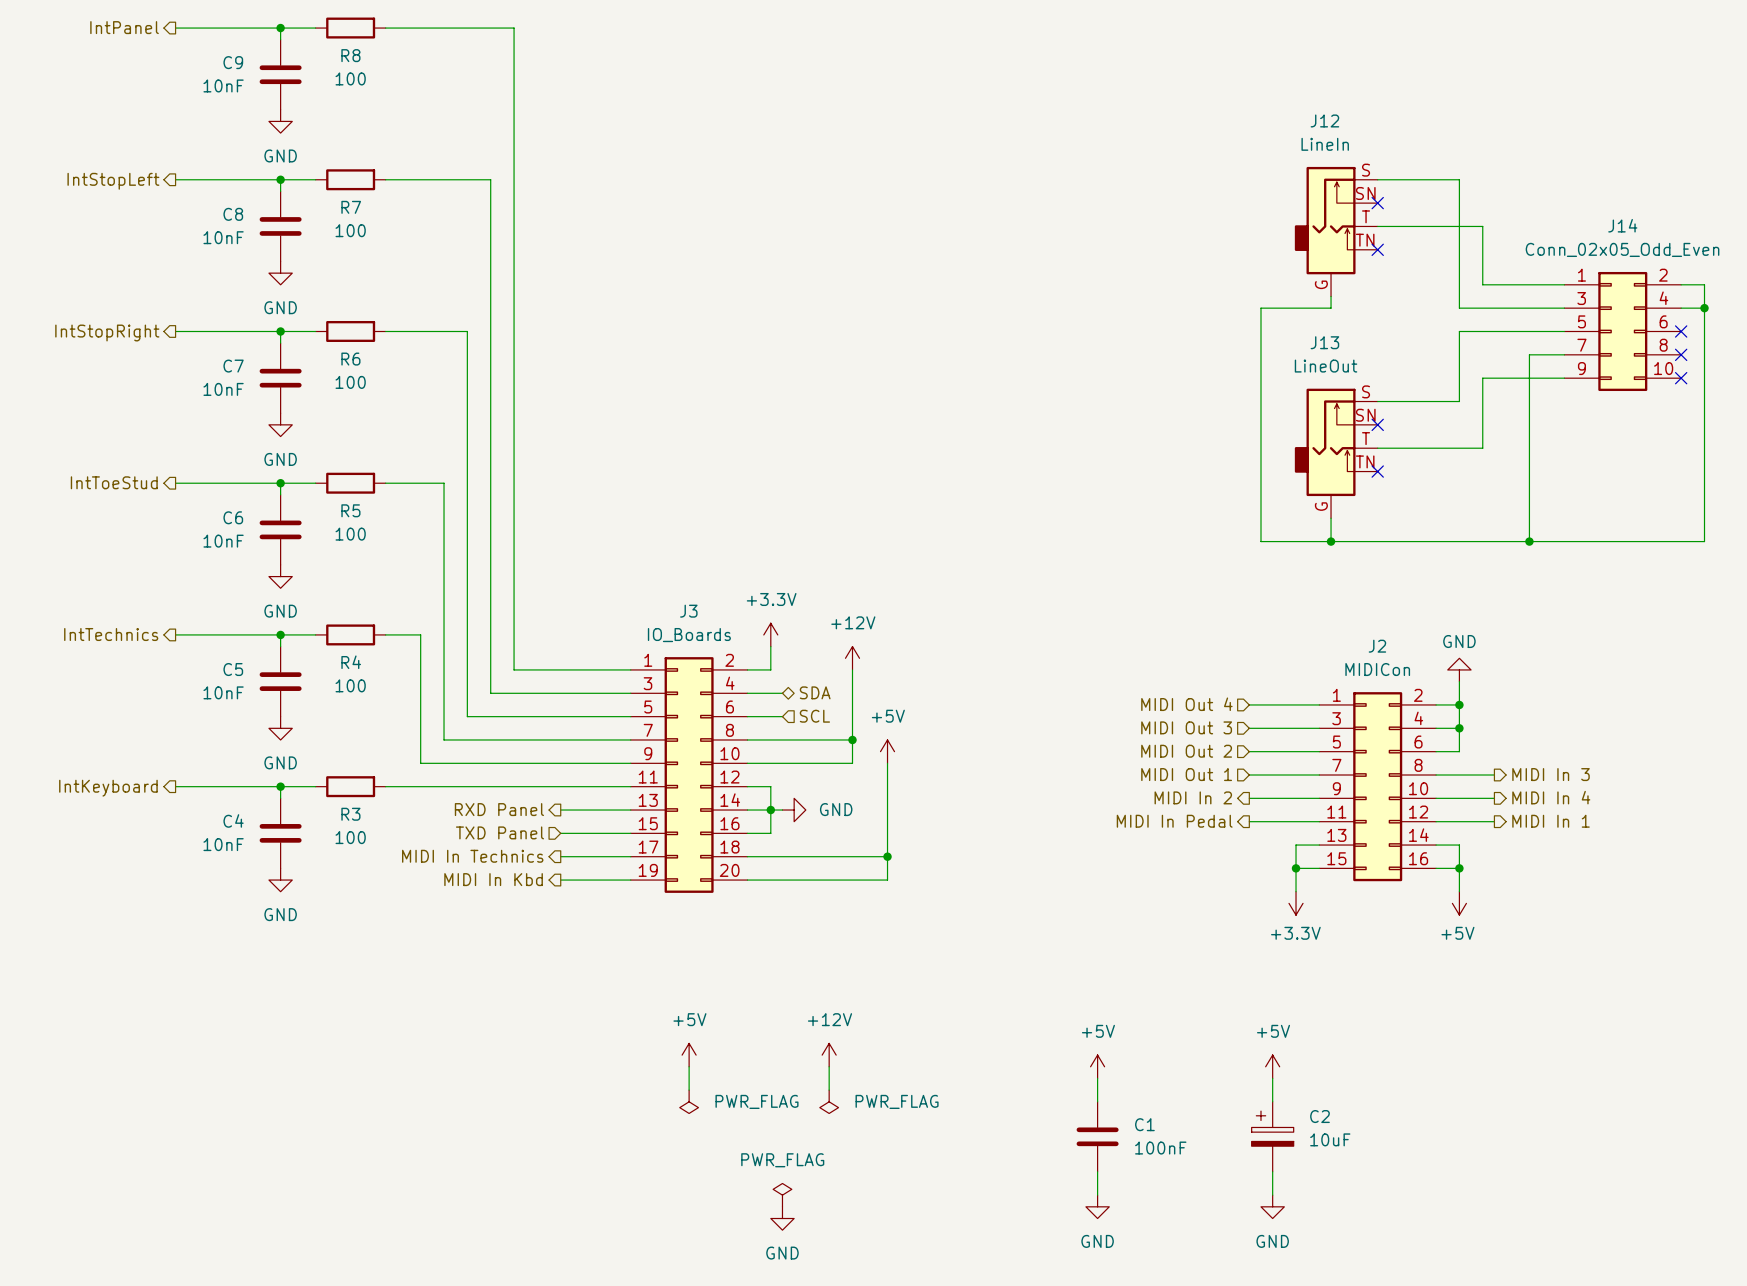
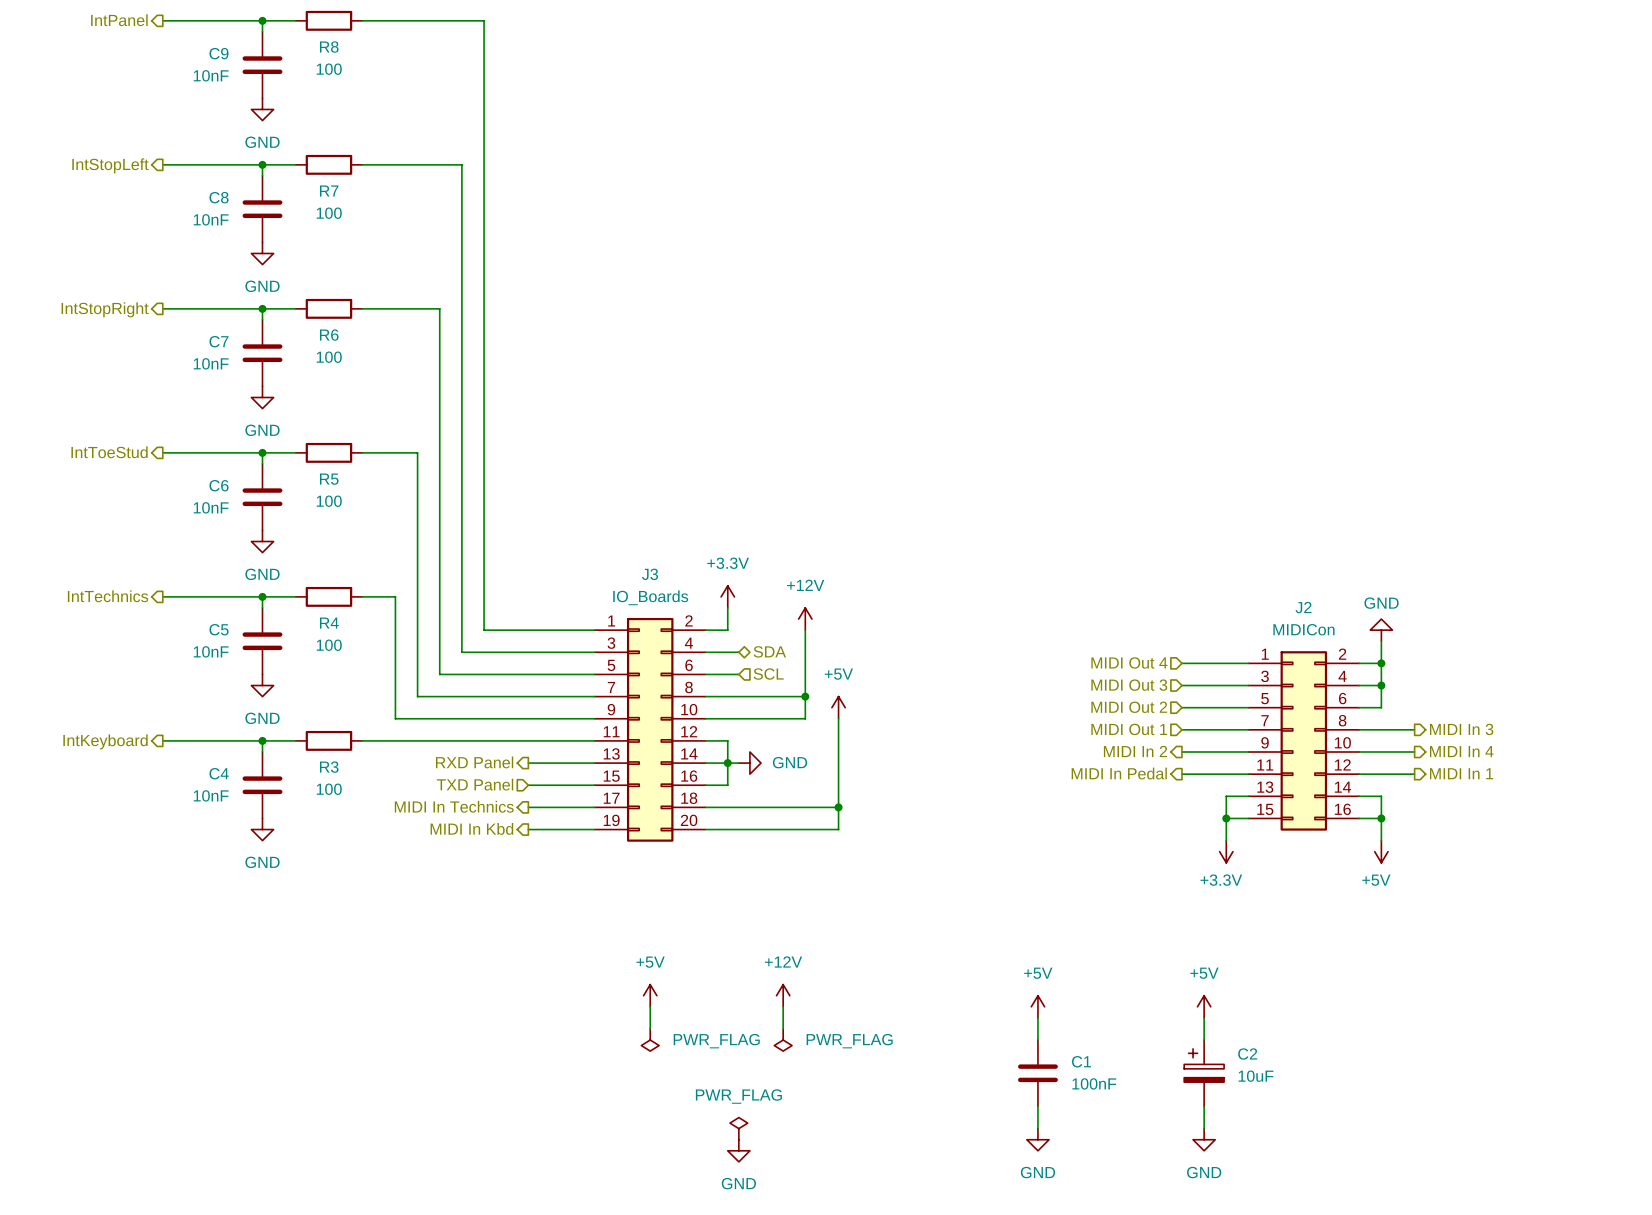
wire: (1377, 179) (1459, 179) (1459, 308) (1564, 308) -> none
no-connect mark: (1377, 203) -> none
wire: (1377, 226) (1482, 226) (1482, 284) (1564, 284) -> none
J12: LineIn (1336, 231) -> none
no-connect mark: (1377, 249) -> none
wire: (1681, 284) (1704, 284) (1704, 541) (1260, 541) (1260, 308) (1331, 308) (1331, 296) -> none
wire: (1681, 308) (1704, 308) -> none
junction: (1704, 308) -> none
wire: (1564, 331) (1459, 331) (1459, 401) (1377, 401) -> none
J14: Conn_02x05_Odd_Even (1622, 331) -> none
no-connect mark: (1681, 331) -> none
wire: (1564, 354) (1529, 354) (1529, 541) -> none
no-connect mark: (1681, 354) -> none
wire: (1564, 378) (1482, 378) (1482, 448) (1377, 448) -> none
no-connect mark: (1681, 378) -> none
no-connect mark: (1377, 424) -> none
J13: LineOut (1336, 453) -> none
no-connect mark: (1377, 471) -> none
wire: (1331, 518) (1331, 541) -> none
junction: (1331, 541) -> none
junction: (1529, 541) -> none

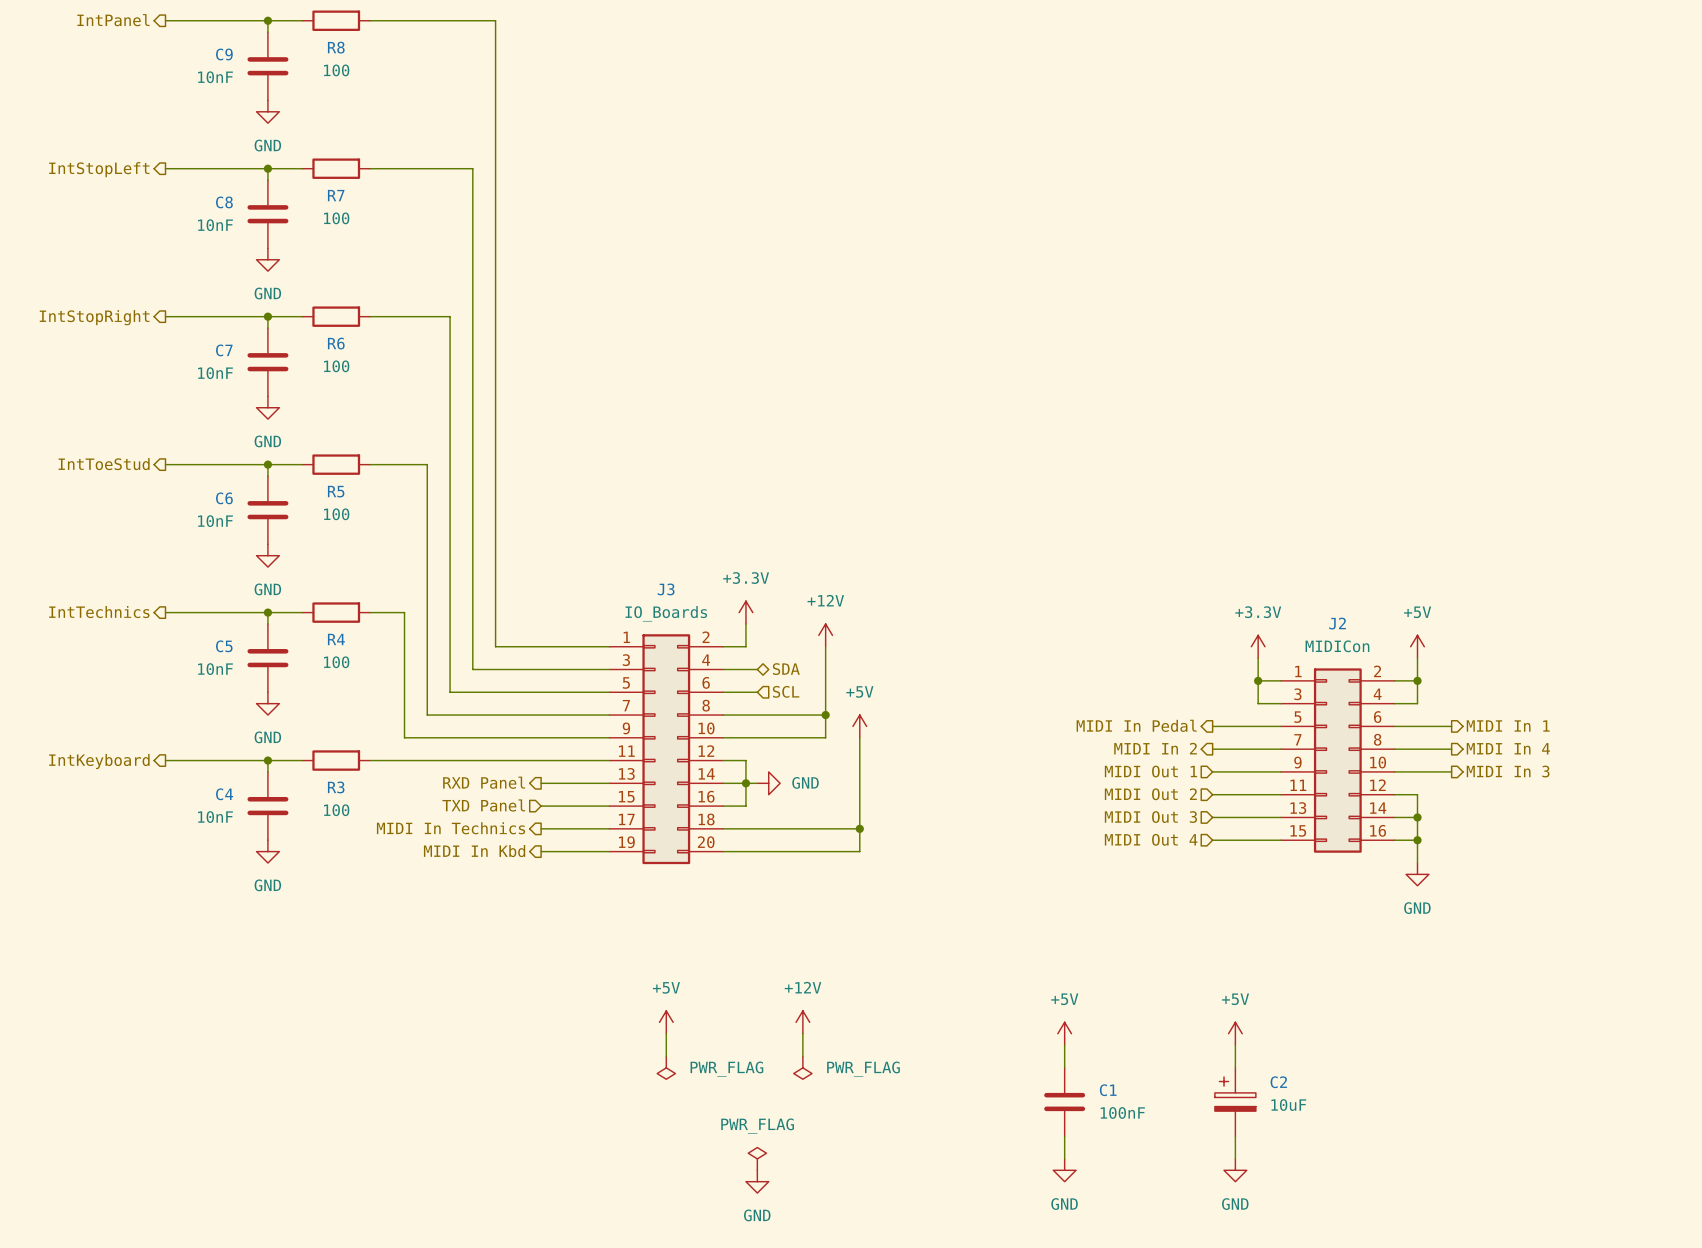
power symbol: none -> +3.3V (1258, 646)
power symbol: GND (1381, 630) -> +5V (1417, 646)
hierarchical label position: MIDI Out 4 (1129, 662) -> MIDI Out 4 (1151, 839)
wire: (1181, 663) (1226, 663) -> (1212, 840) (1258, 840)
junction: none -> (1258, 680)
hierarchical label position: MIDI Out 3 (1129, 685) -> MIDI Out 3 (1150, 817)
wire: (1181, 685) (1226, 685) -> (1258, 658) (1258, 703)
wire: (1381, 685) (1381, 707) -> (1451, 726) (1417, 726)
junction: (1381, 685) -> none
hierarchical label shape: input (1129, 707) -> output (1136, 725)
hierarchical label: MIDI Out 2 (1129, 707) -> MIDI In Pedal (1136, 725)
hierarchical label shape: input (1129, 729) -> output (1155, 748)
hierarchical label: MIDI Out 1 (1129, 729) -> MIDI In 2 (1155, 748)
hierarchical label: MIDI In 3 (1461, 729) -> MIDI In 4 (1508, 748)
hierarchical label shape: output (1135, 751) -> input (1150, 771)
hierarchical label: MIDI In 2 (1135, 751) -> MIDI Out 1 (1150, 771)
hierarchical label: MIDI In 4 (1461, 751) -> MIDI In 3 (1508, 771)
hierarchical label shape: output (1119, 773) -> input (1150, 794)
hierarchical label: MIDI In Pedal (1119, 773) -> MIDI Out 2 (1150, 794)
hierarchical label position: MIDI In 1 (1461, 773) -> MIDI In 1 (1508, 725)
wire: (1381, 774) (1414, 774) -> (1417, 794) (1417, 817)
wire: (1226, 796) (1226, 840) -> (1258, 817) (1212, 817)
junction: none -> (1417, 817)
junction: (1226, 818) -> none
power symbol: +3.3V (1226, 851) -> none
power symbol: +5V (1381, 851) -> GND (1417, 874)

